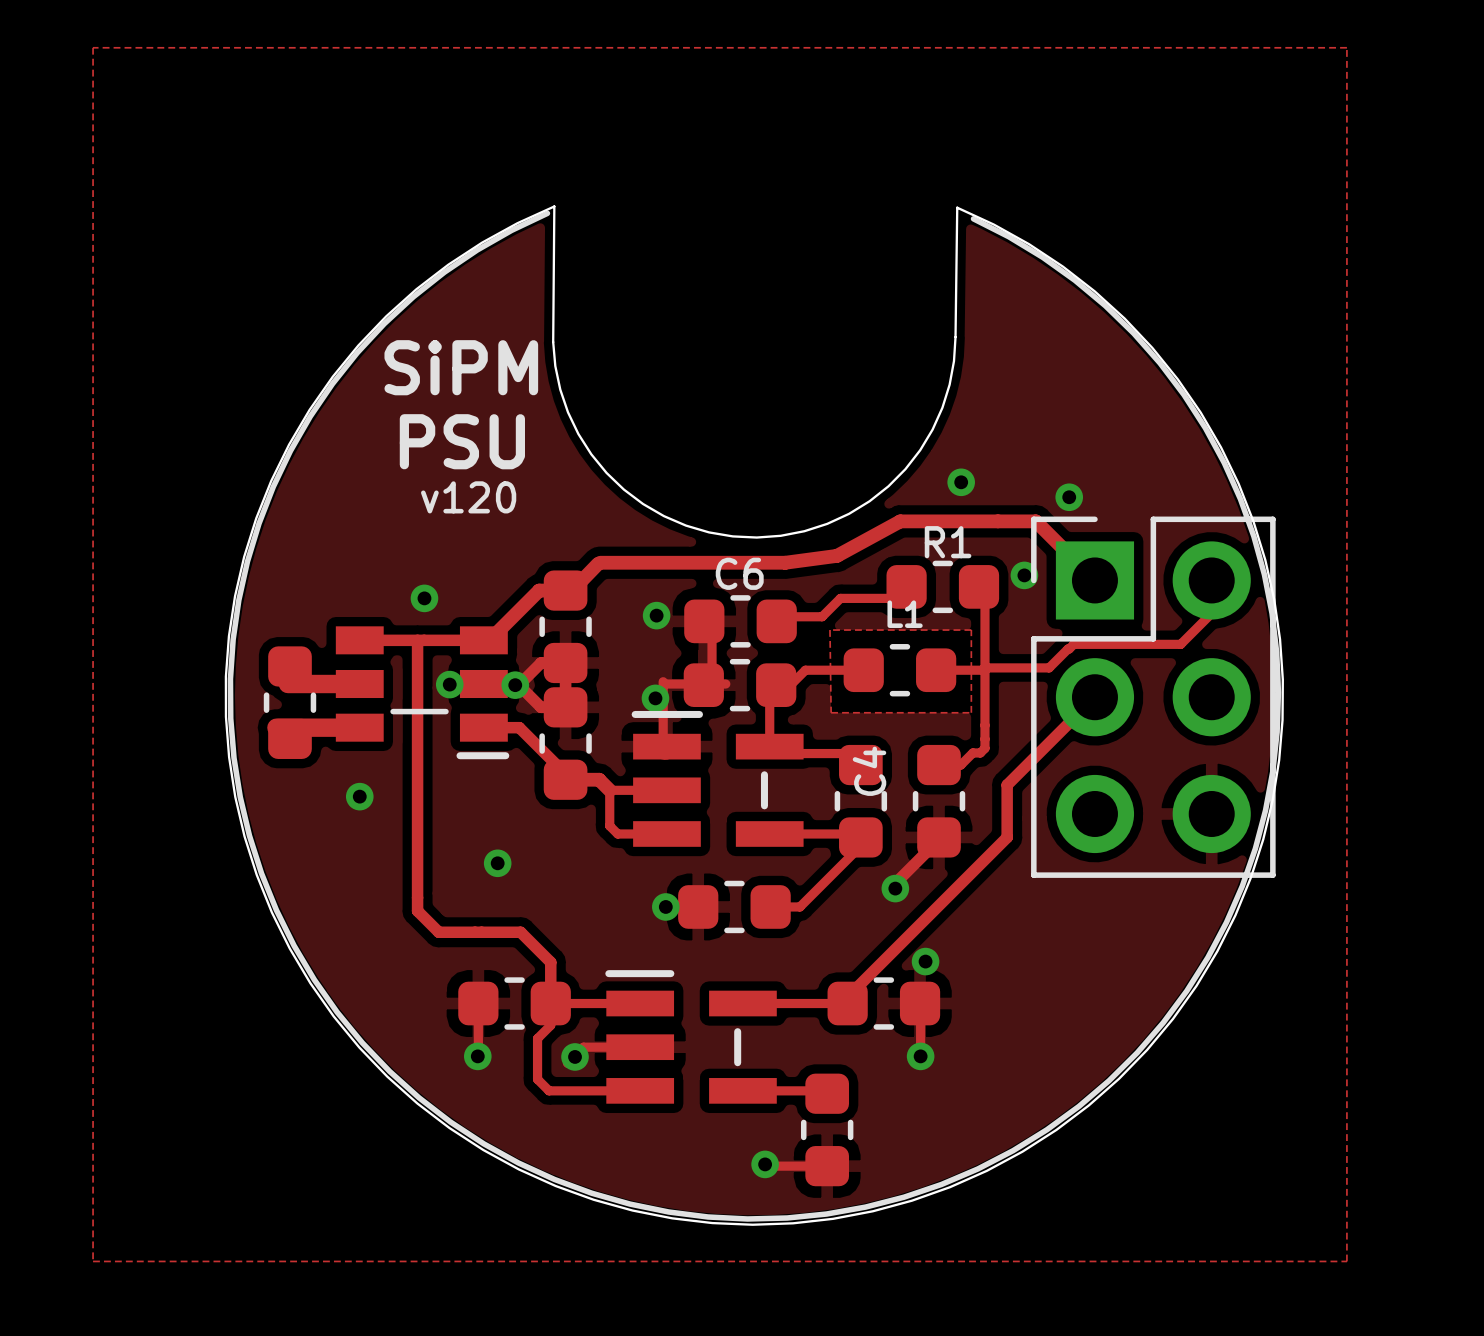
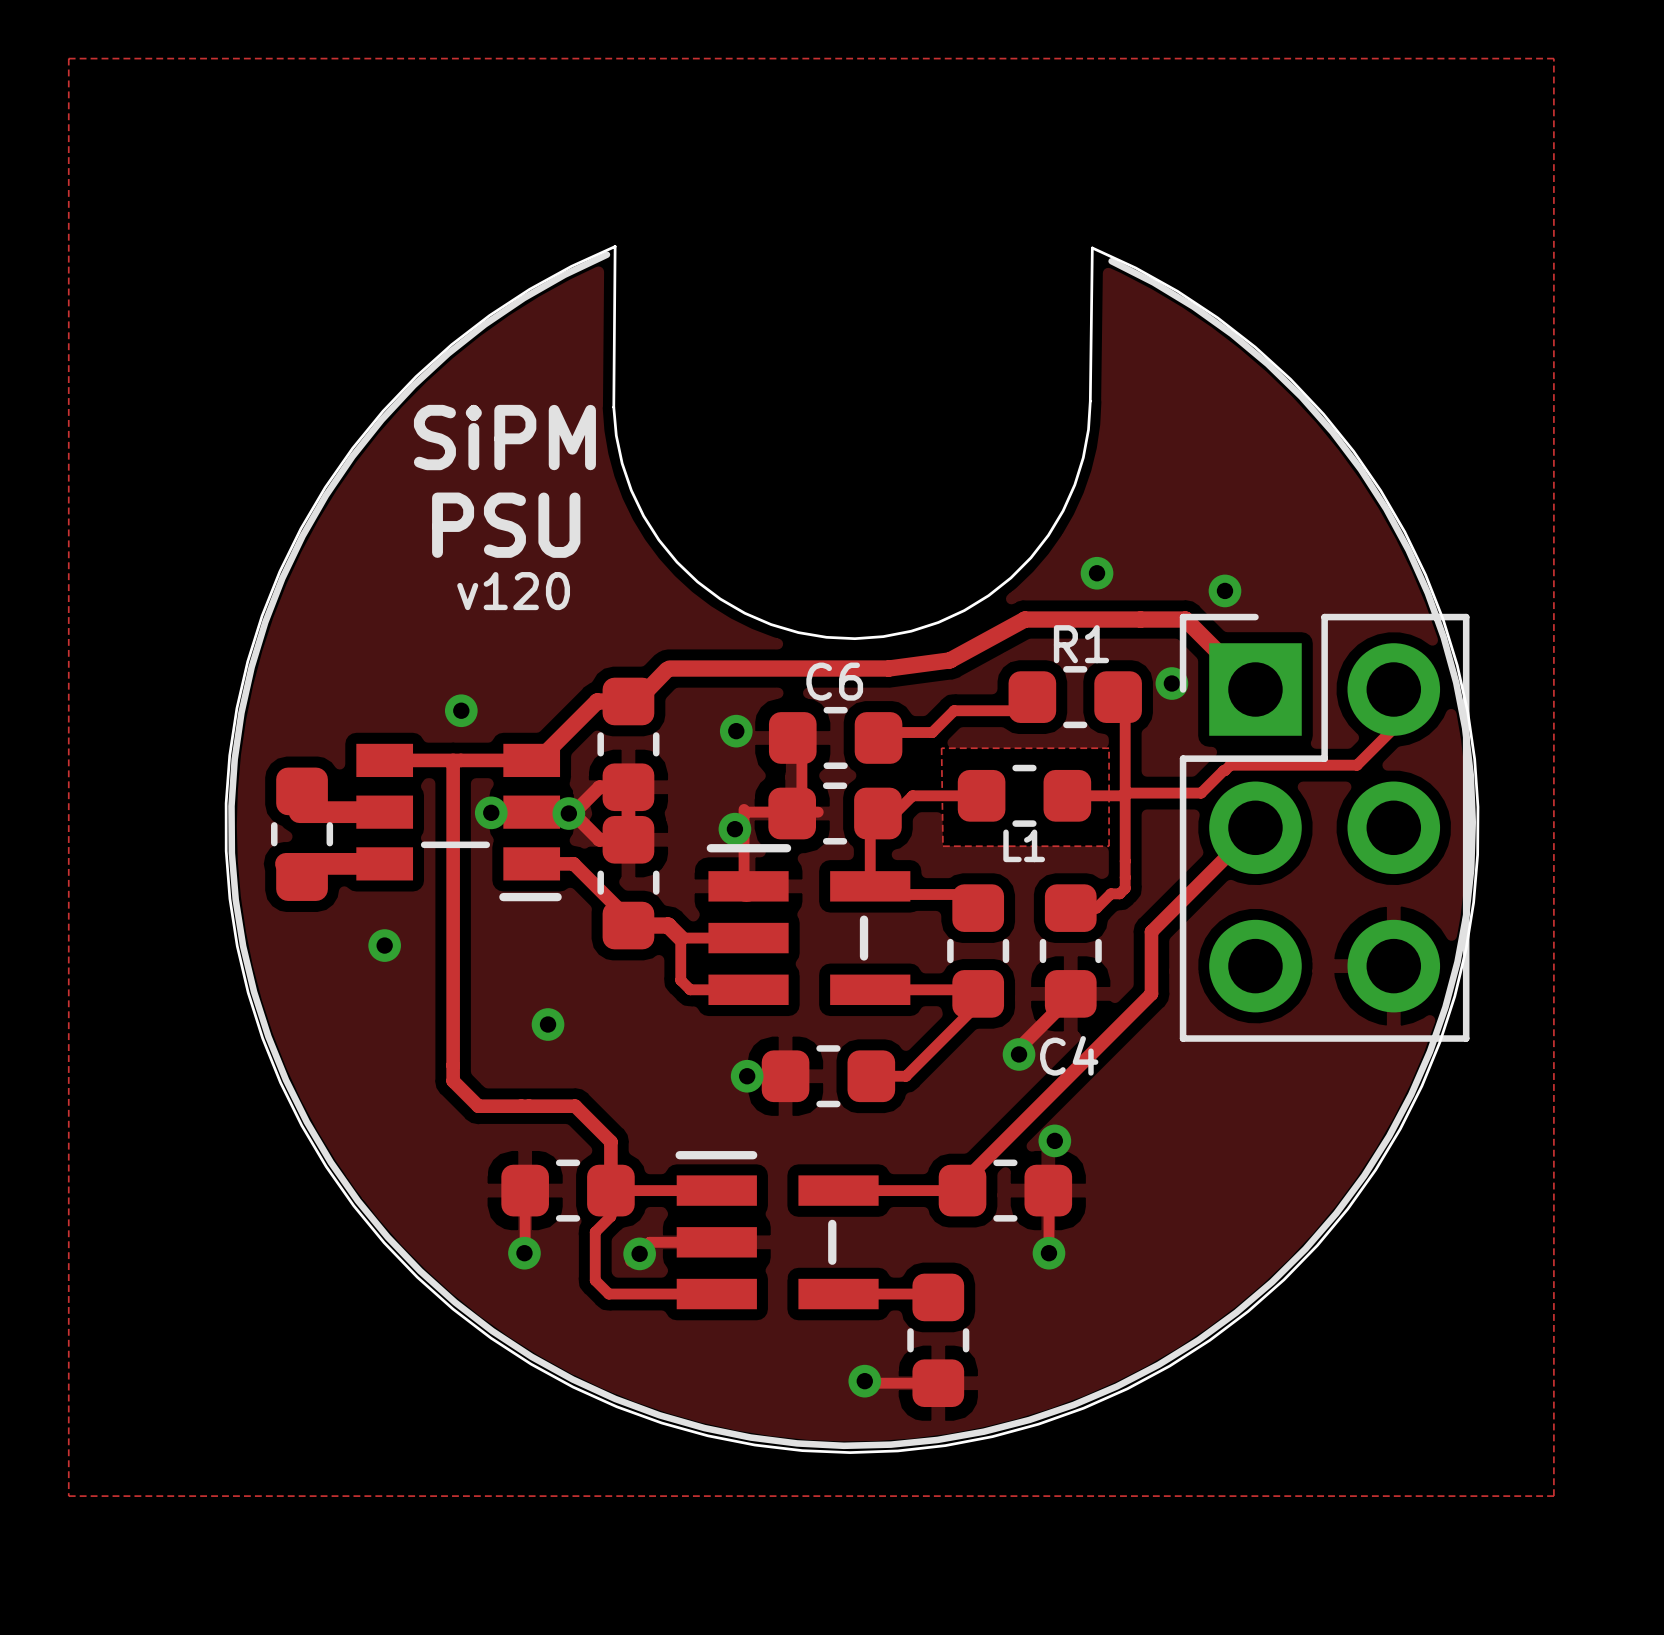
L1 name position: L1 (905, 614) -> L1 (1024, 845)
C4 name rotation: 0° (869, 771) -> 90° clockwise (1069, 1055)
C4 name position: C4 (869, 771) -> C4 (1069, 1055)

